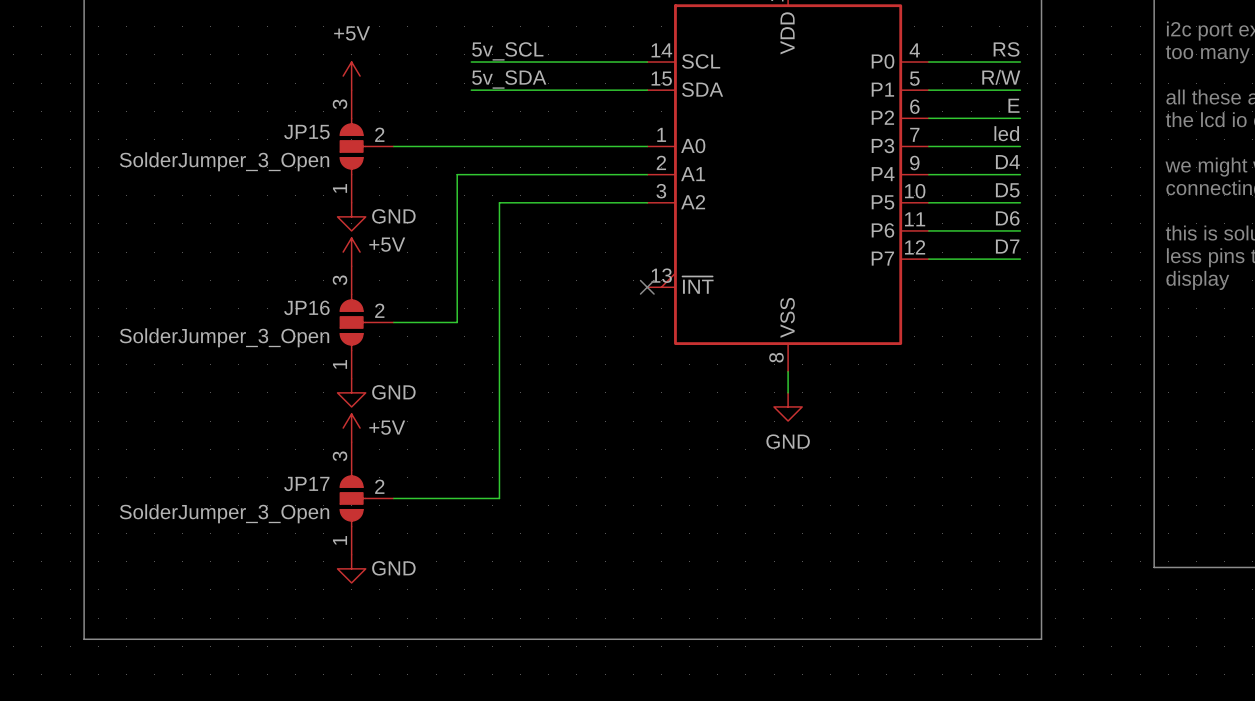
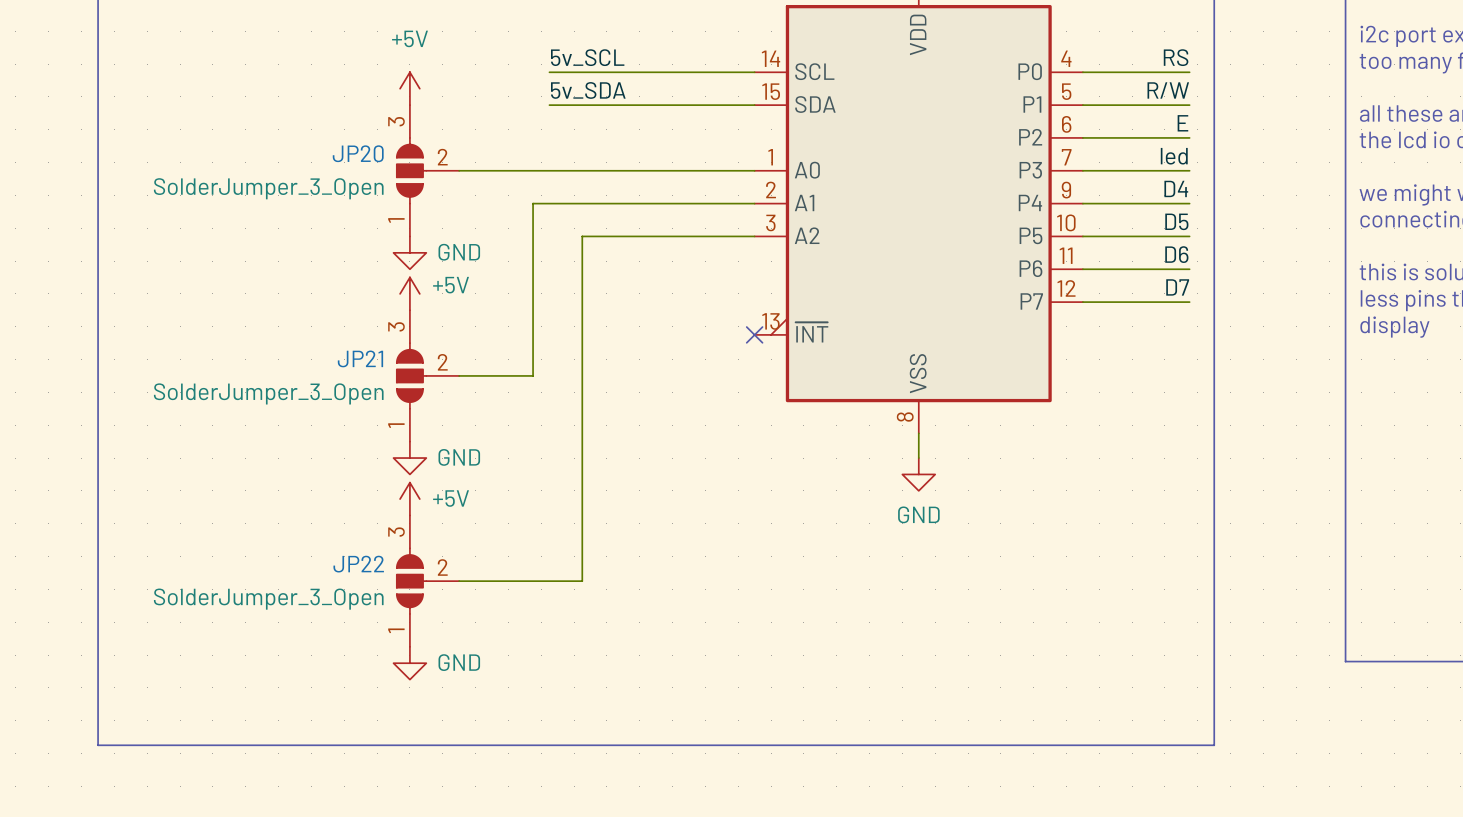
JP15 name: JP15 (306, 131) -> JP20 (358, 153)
JP16 name: JP16 (306, 307) -> JP21 (360, 358)
JP17 name: JP17 (306, 483) -> JP22 (358, 564)

